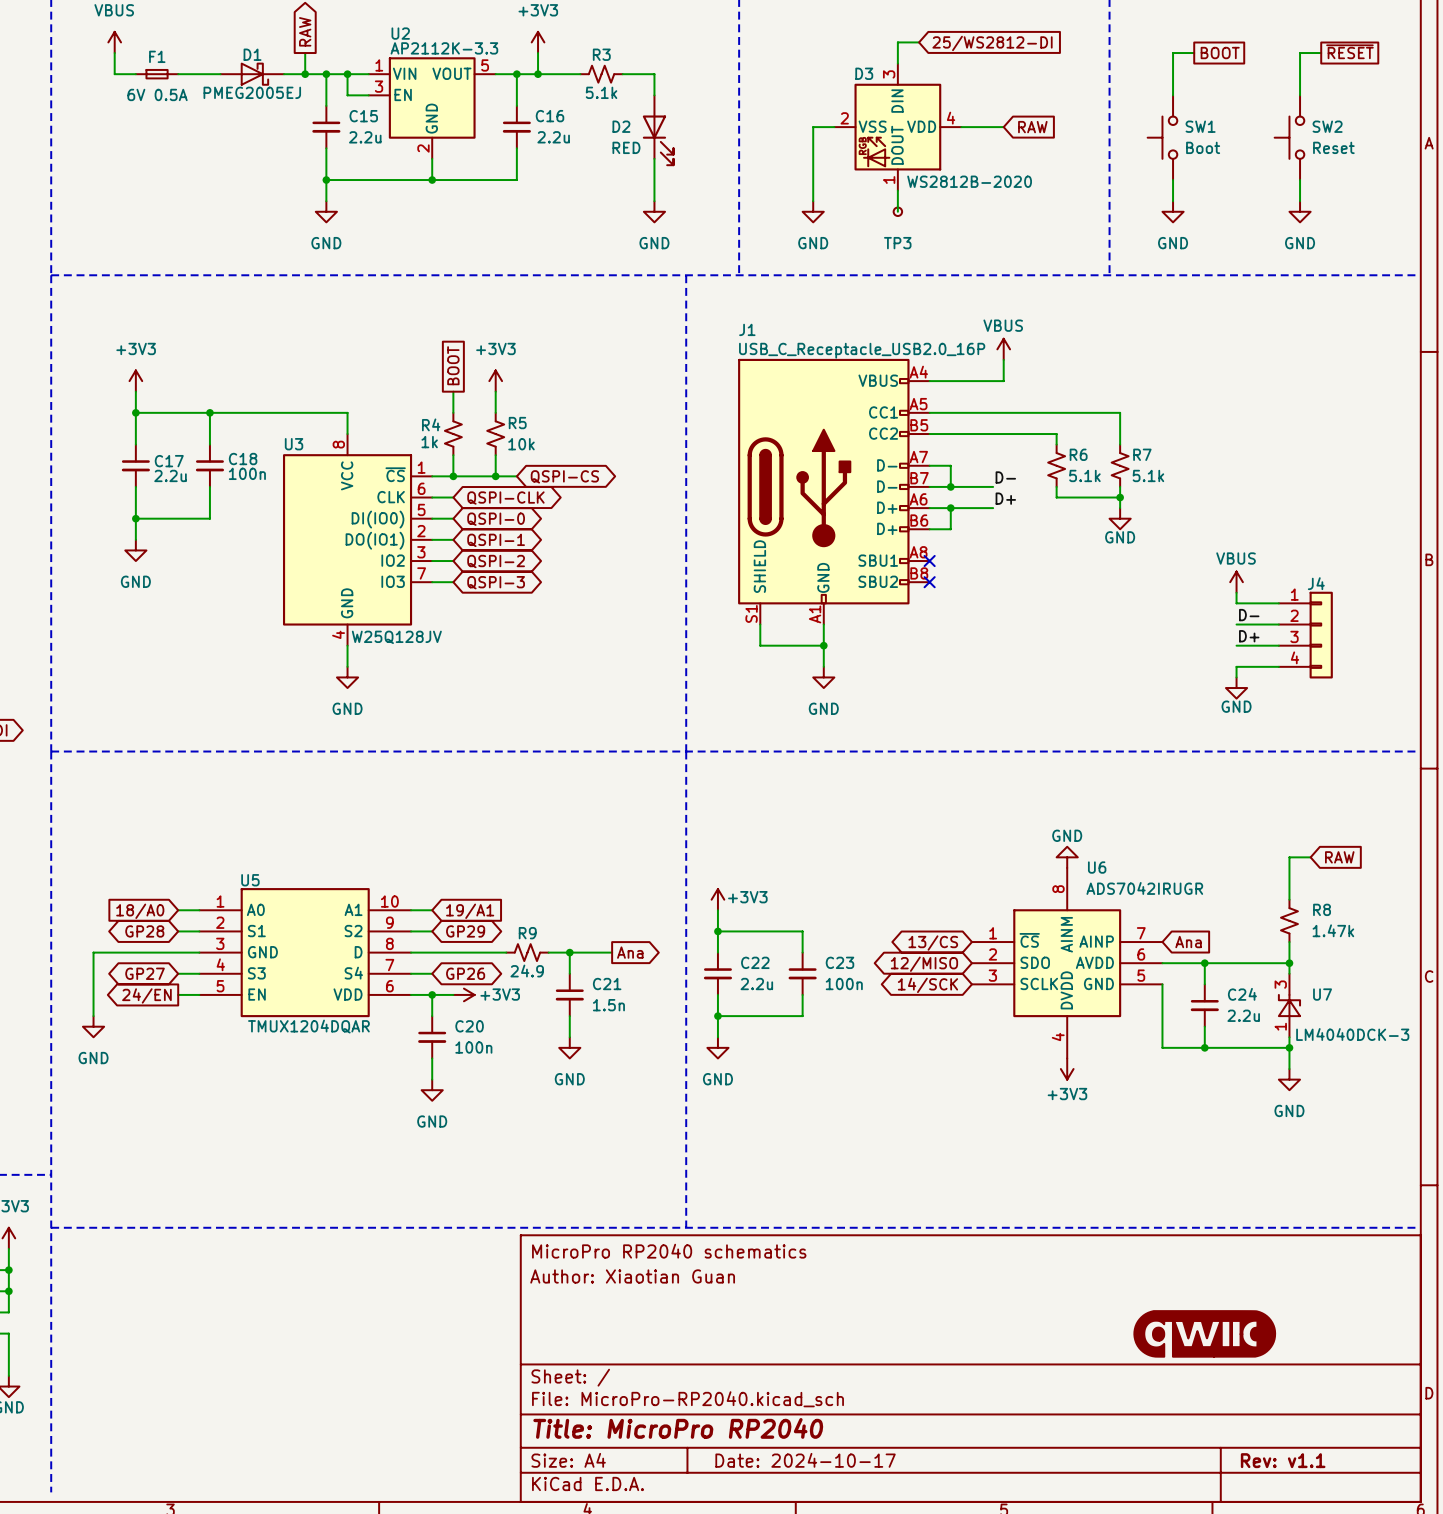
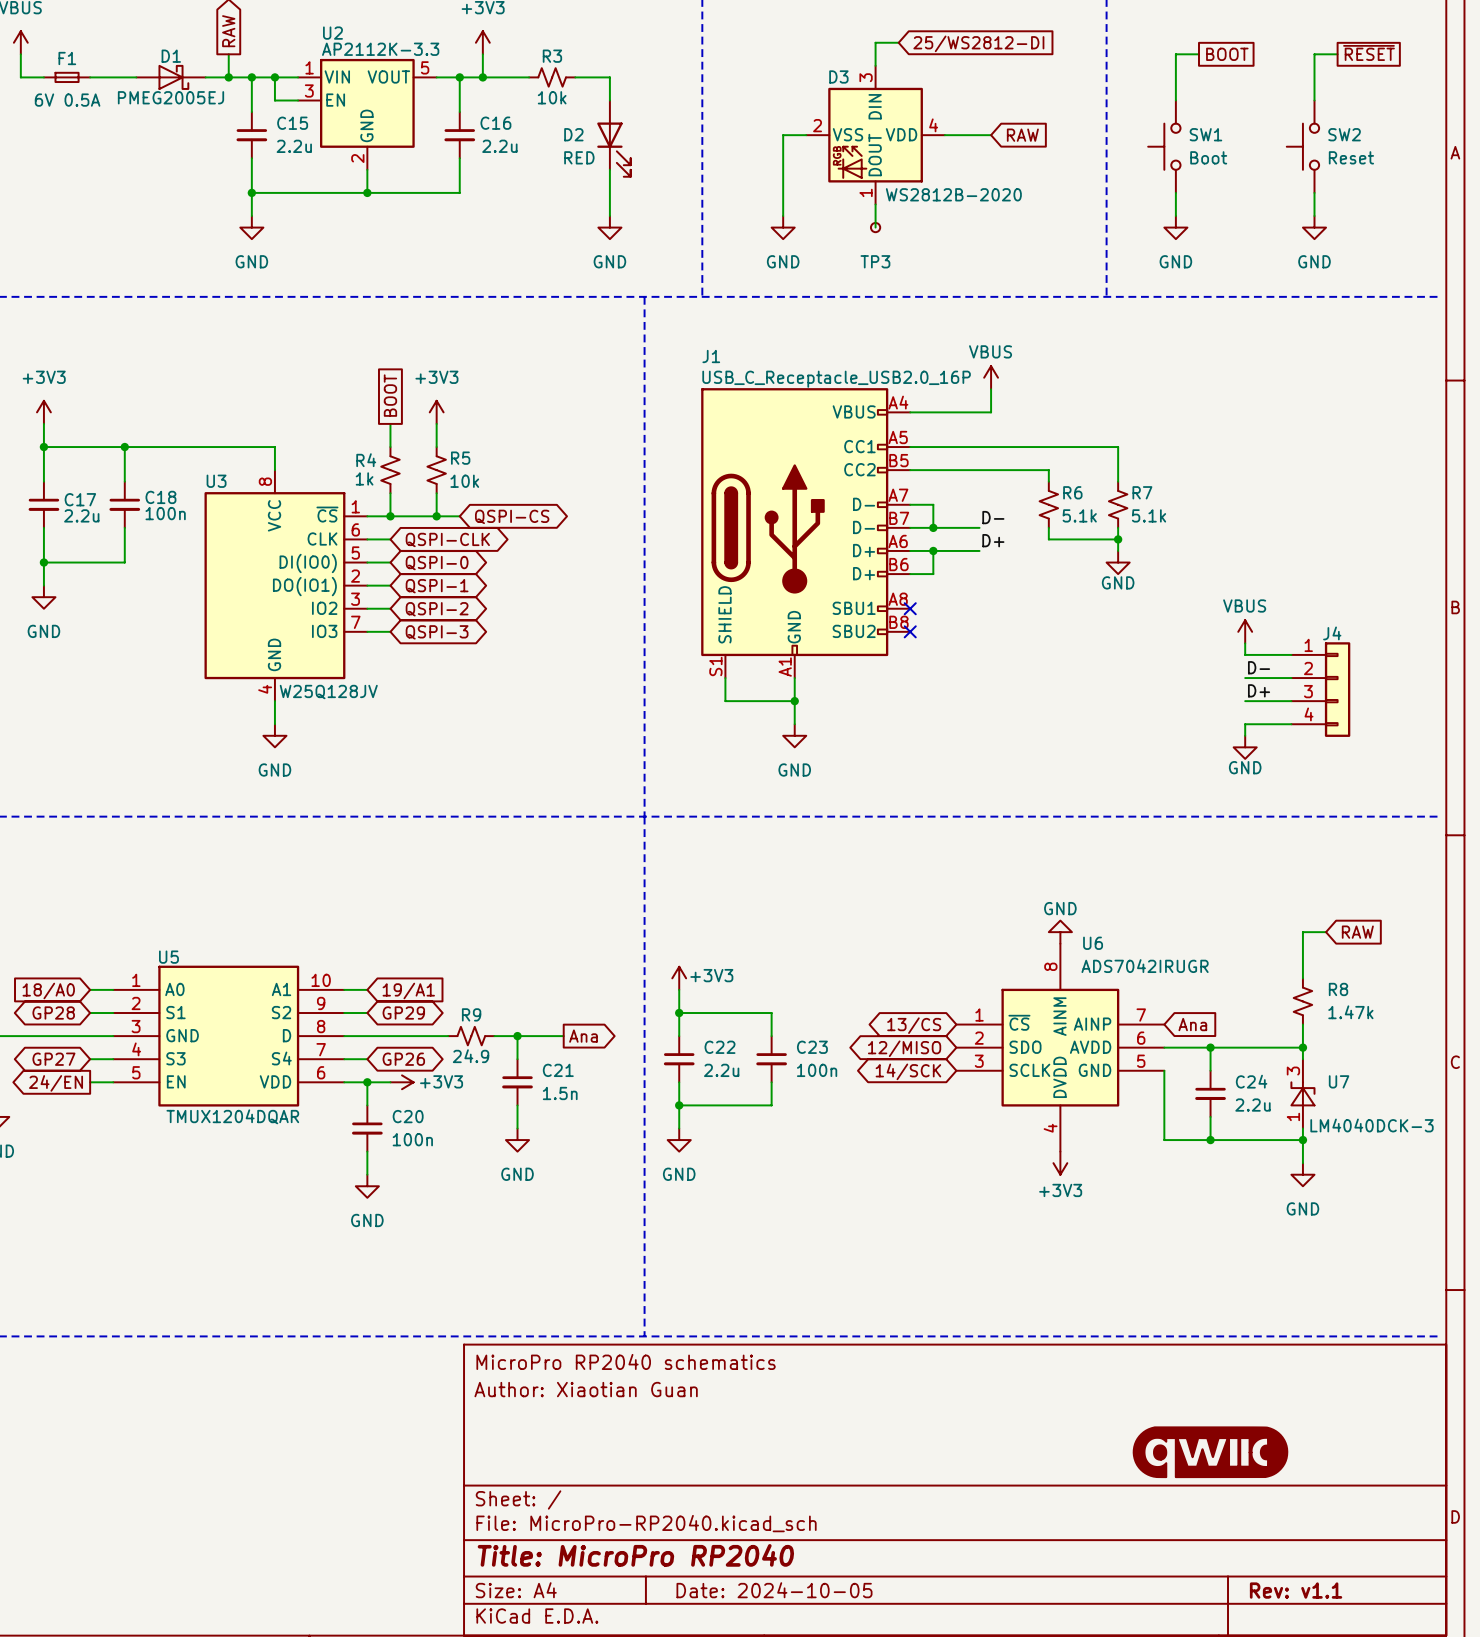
R3 value: 5.1k (601, 92) -> 10k (552, 97)
title block: Date: 2024-10-17 (805, 1460) -> Date: 2024-10-05 (774, 1590)

